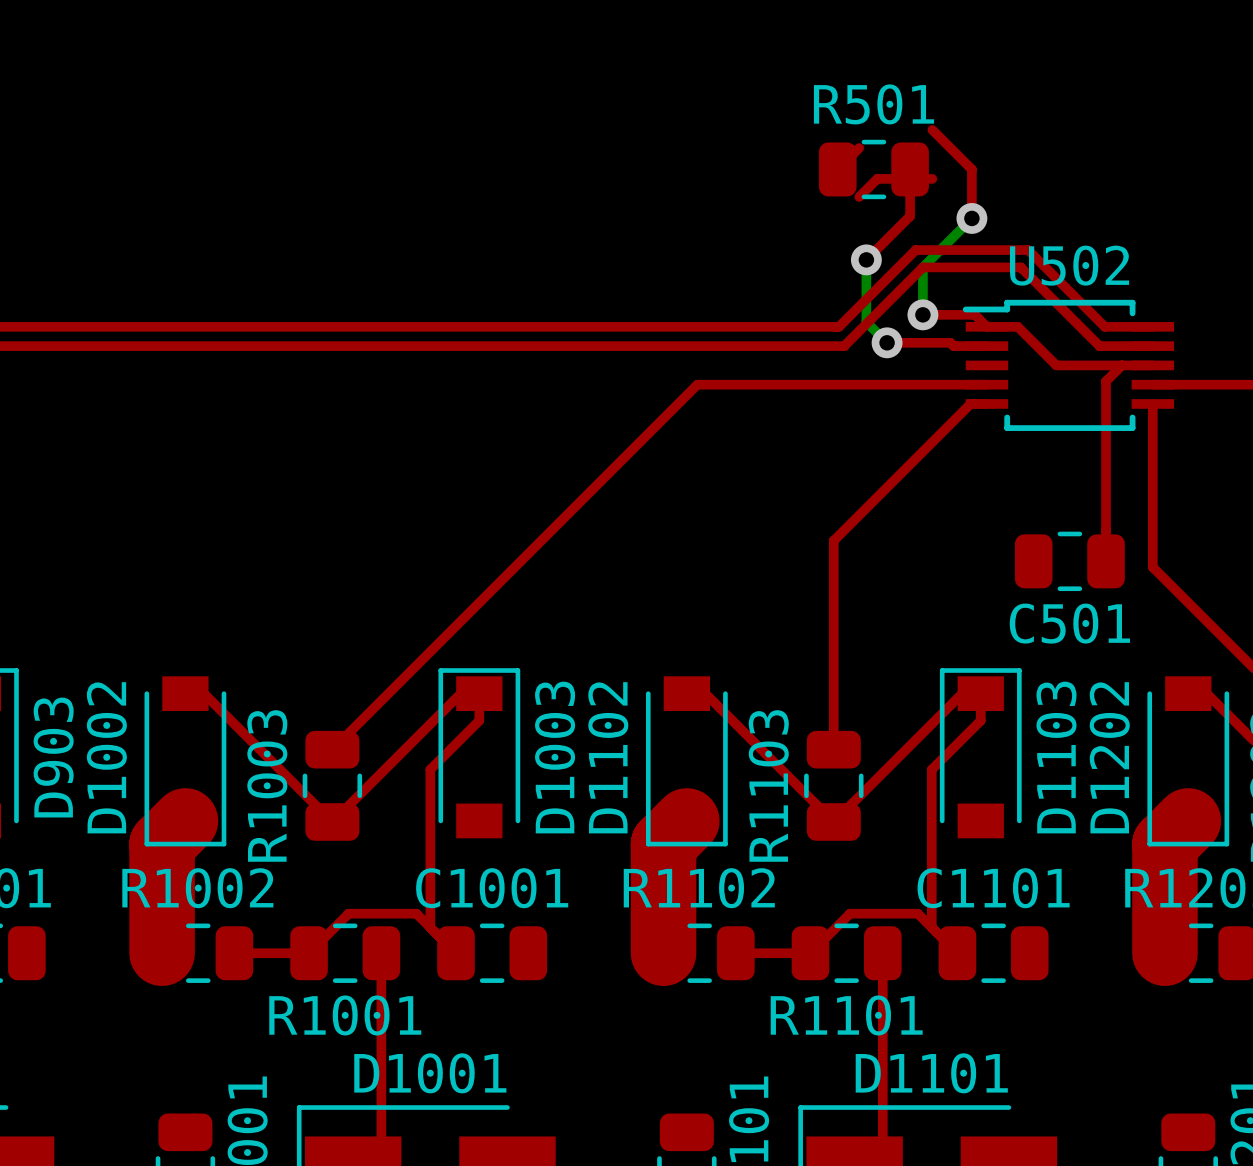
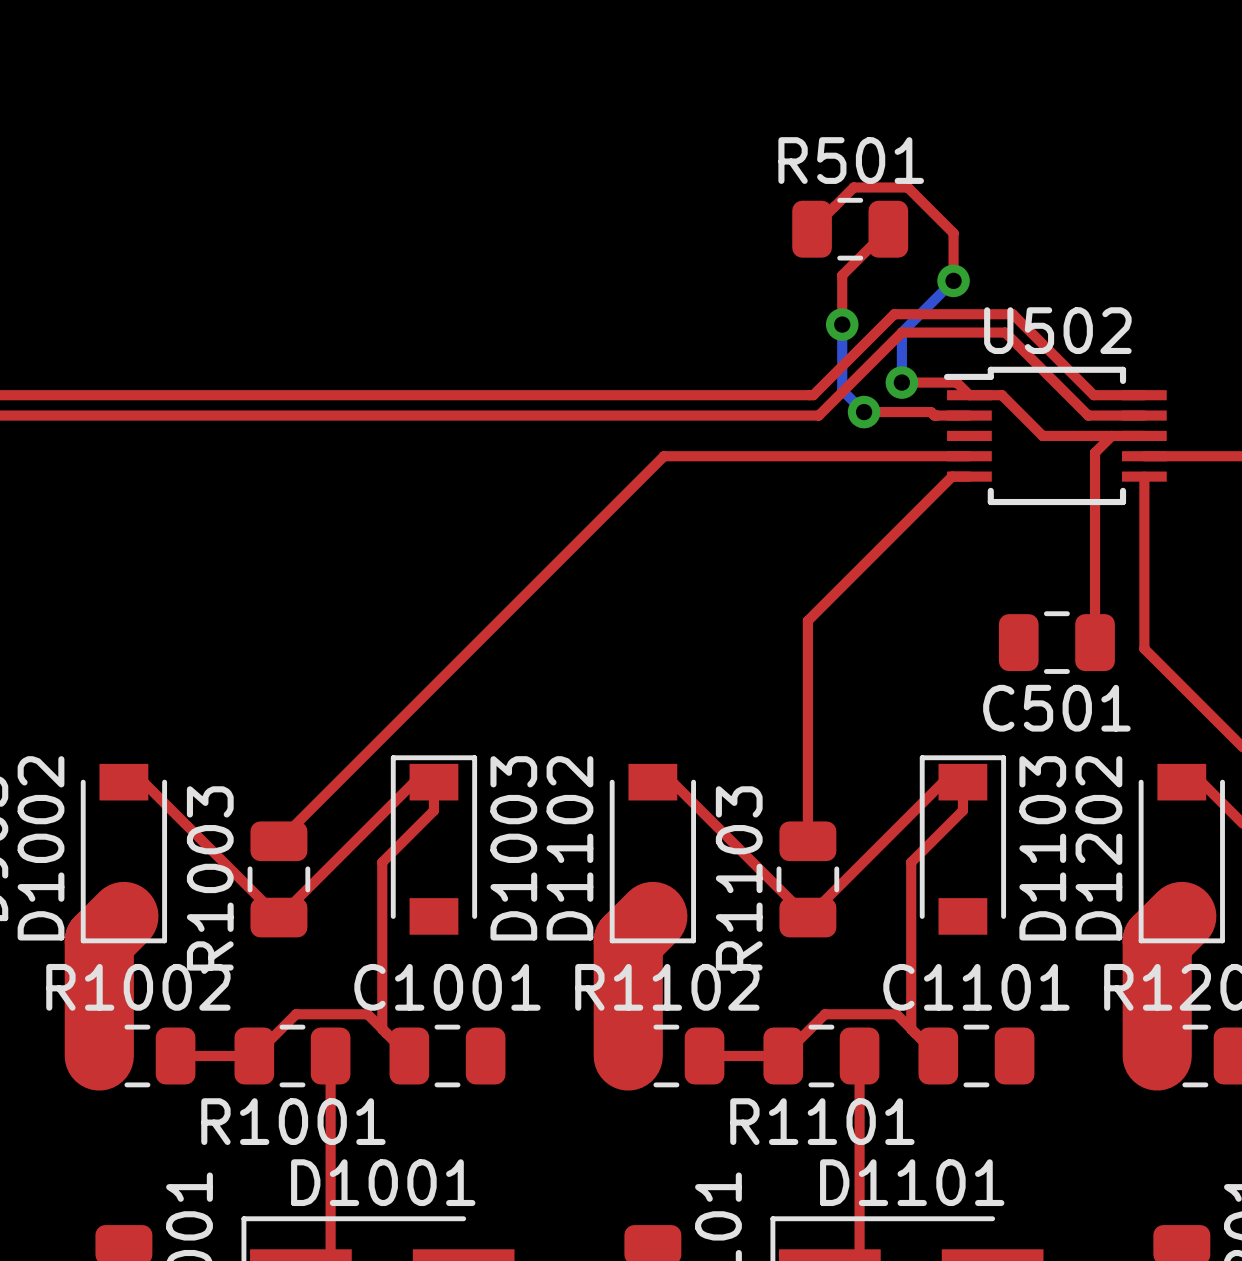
top track: (932, 129) (971, 169) (971, 173) -> (834, 206) (853, 187) (907, 187) (953, 233)
top track: (910, 169) (910, 216) (866, 259) -> (888, 229) (842, 275) (842, 324)
top track: (932, 178) (877, 178) (859, 196) -> none

